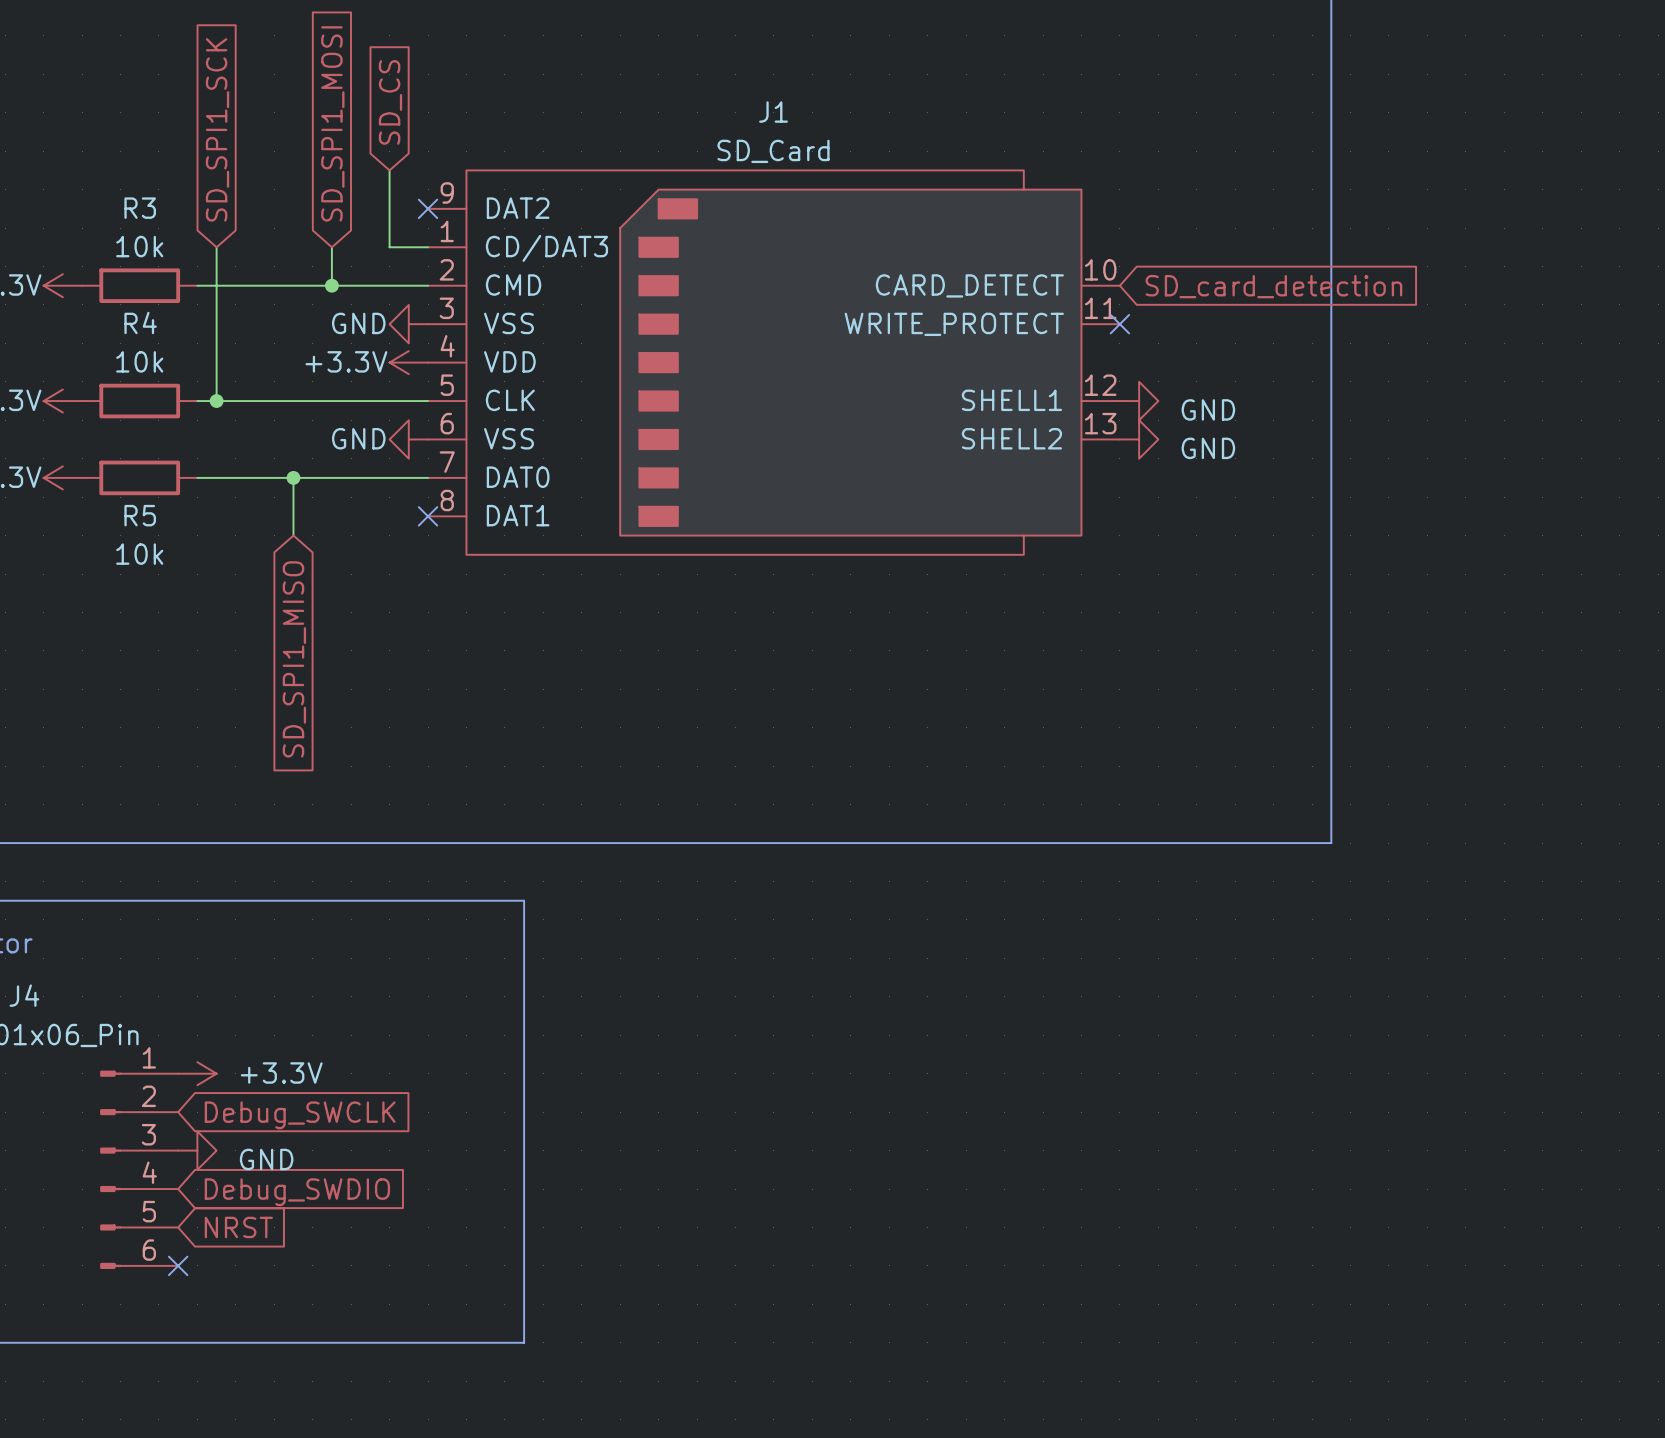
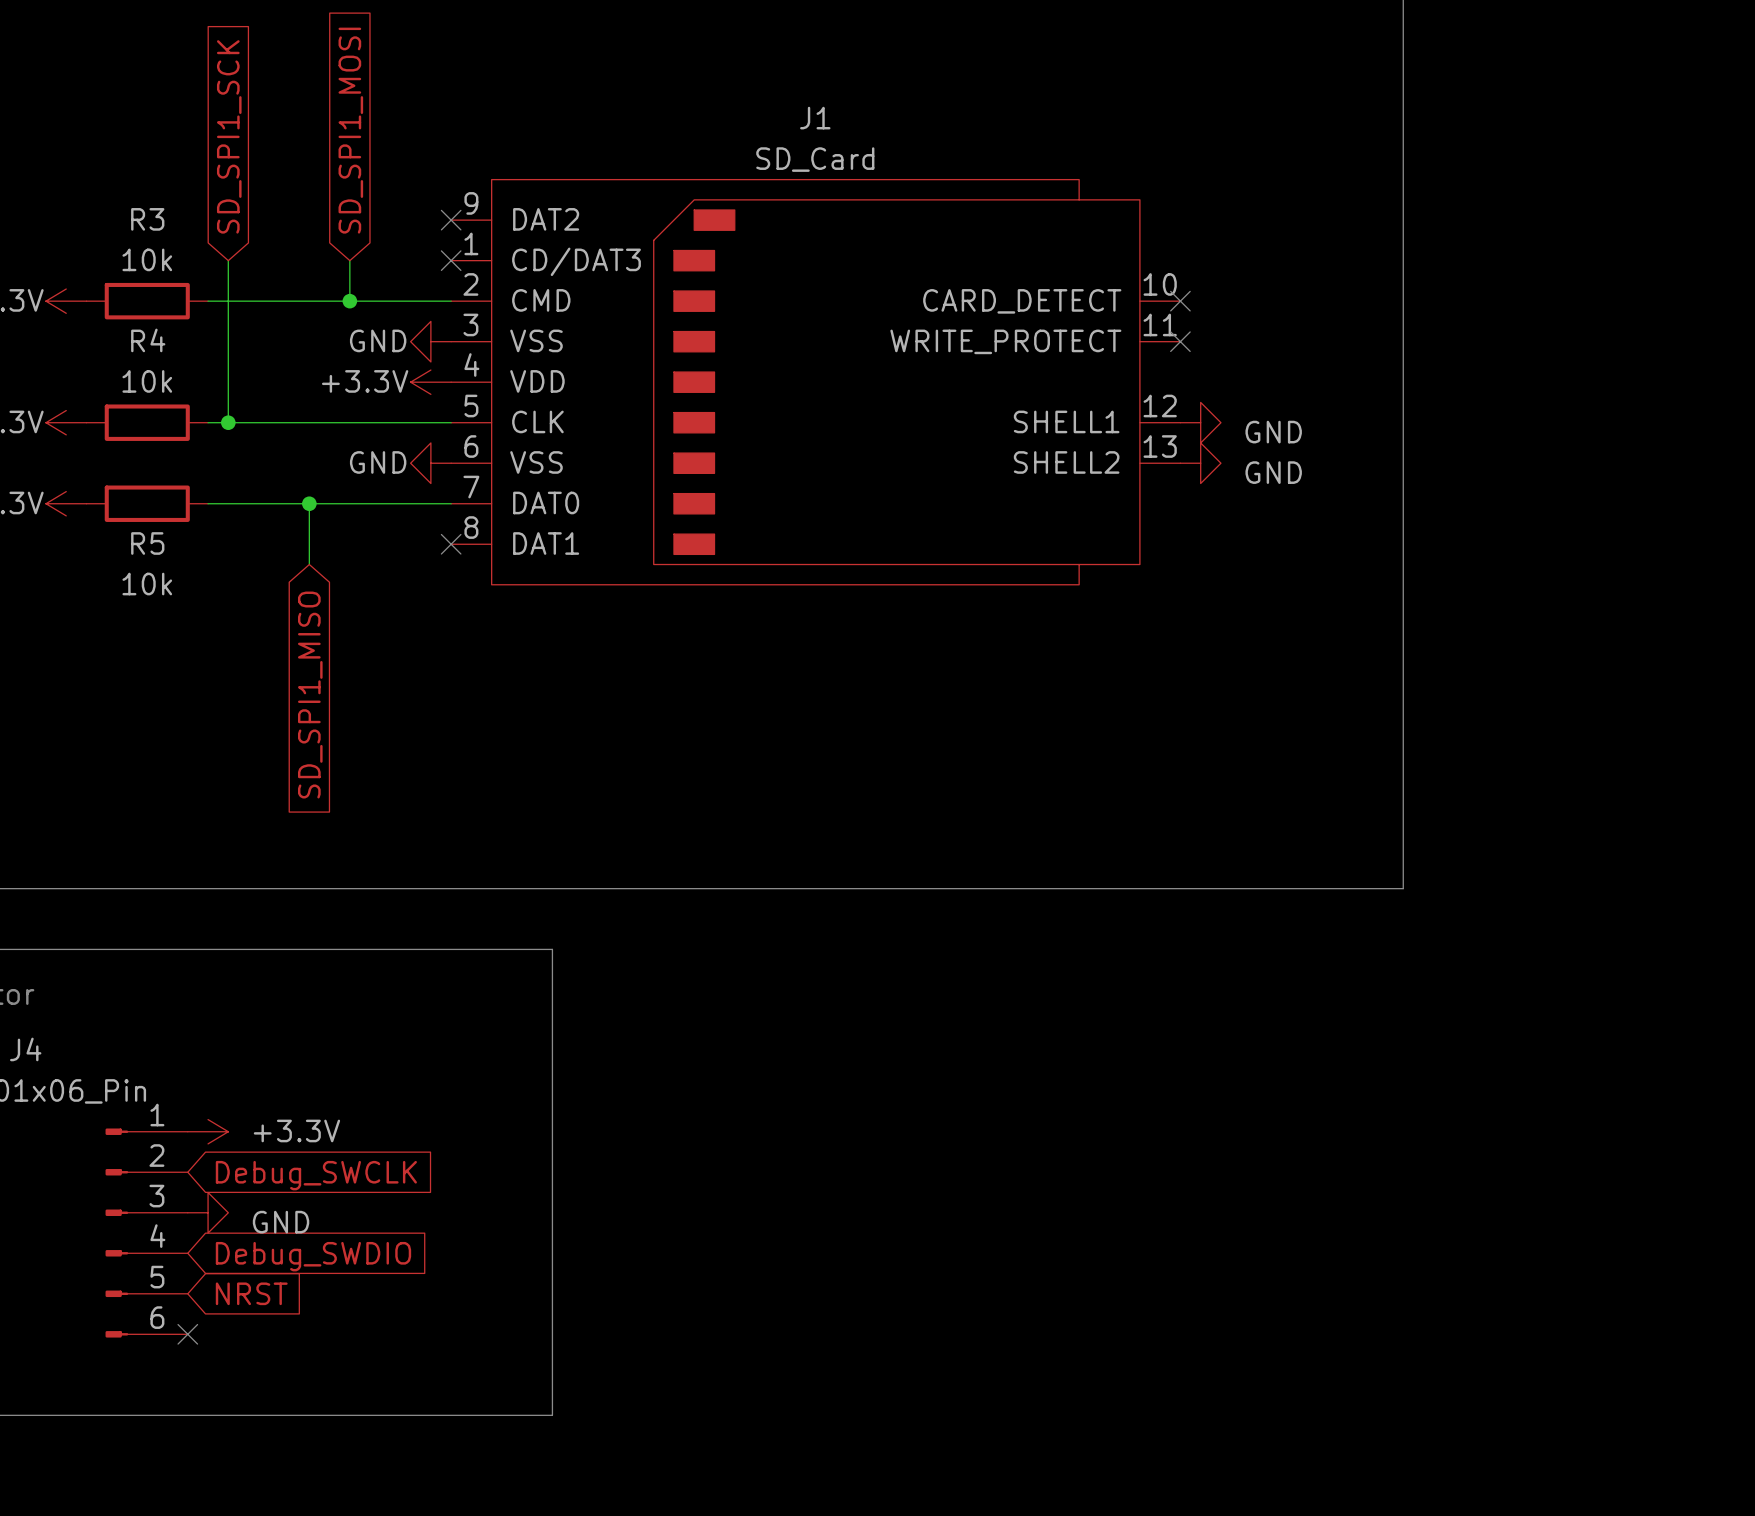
global label: SD_CS (390, 102) -> none
wire: (389, 170) (389, 247) (428, 247) -> none
no-connect mark: none -> (451, 260)
no-connect mark: none -> (1180, 301)
global label: SD_card_detection (1273, 286) -> none

